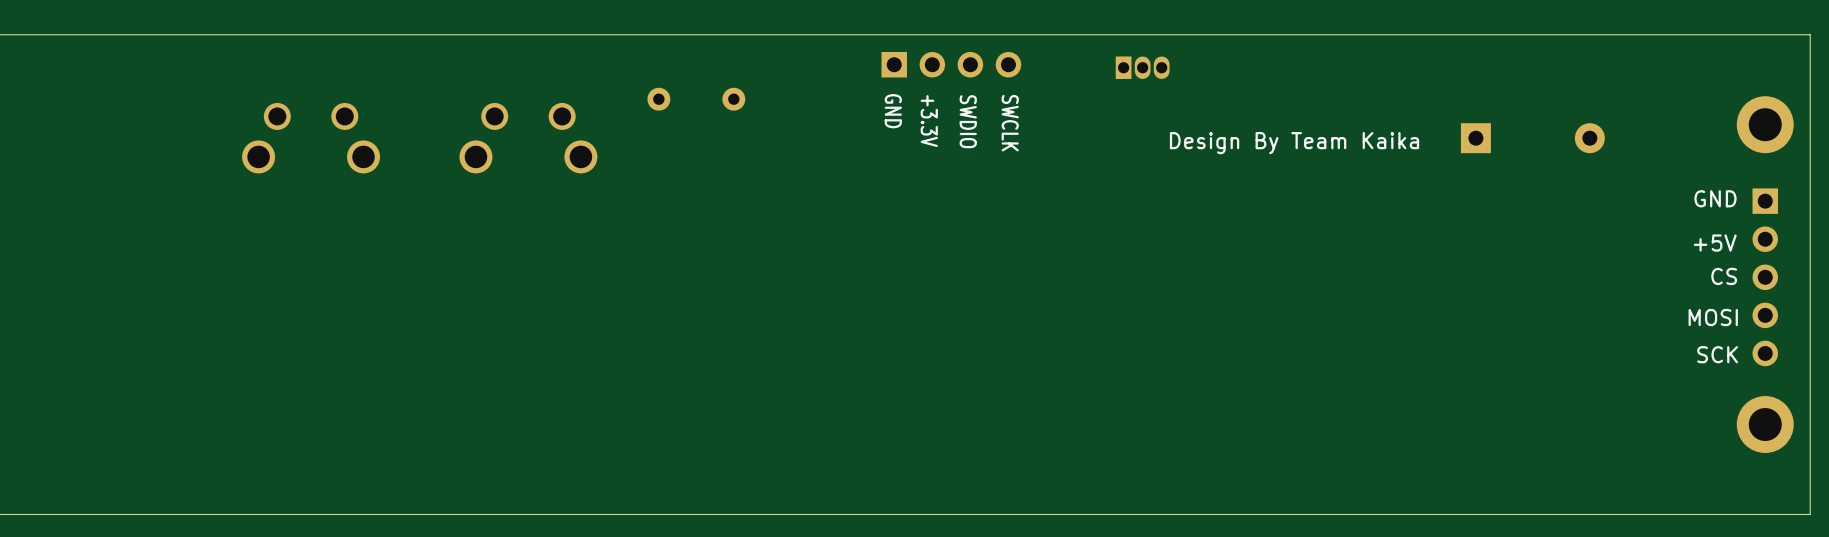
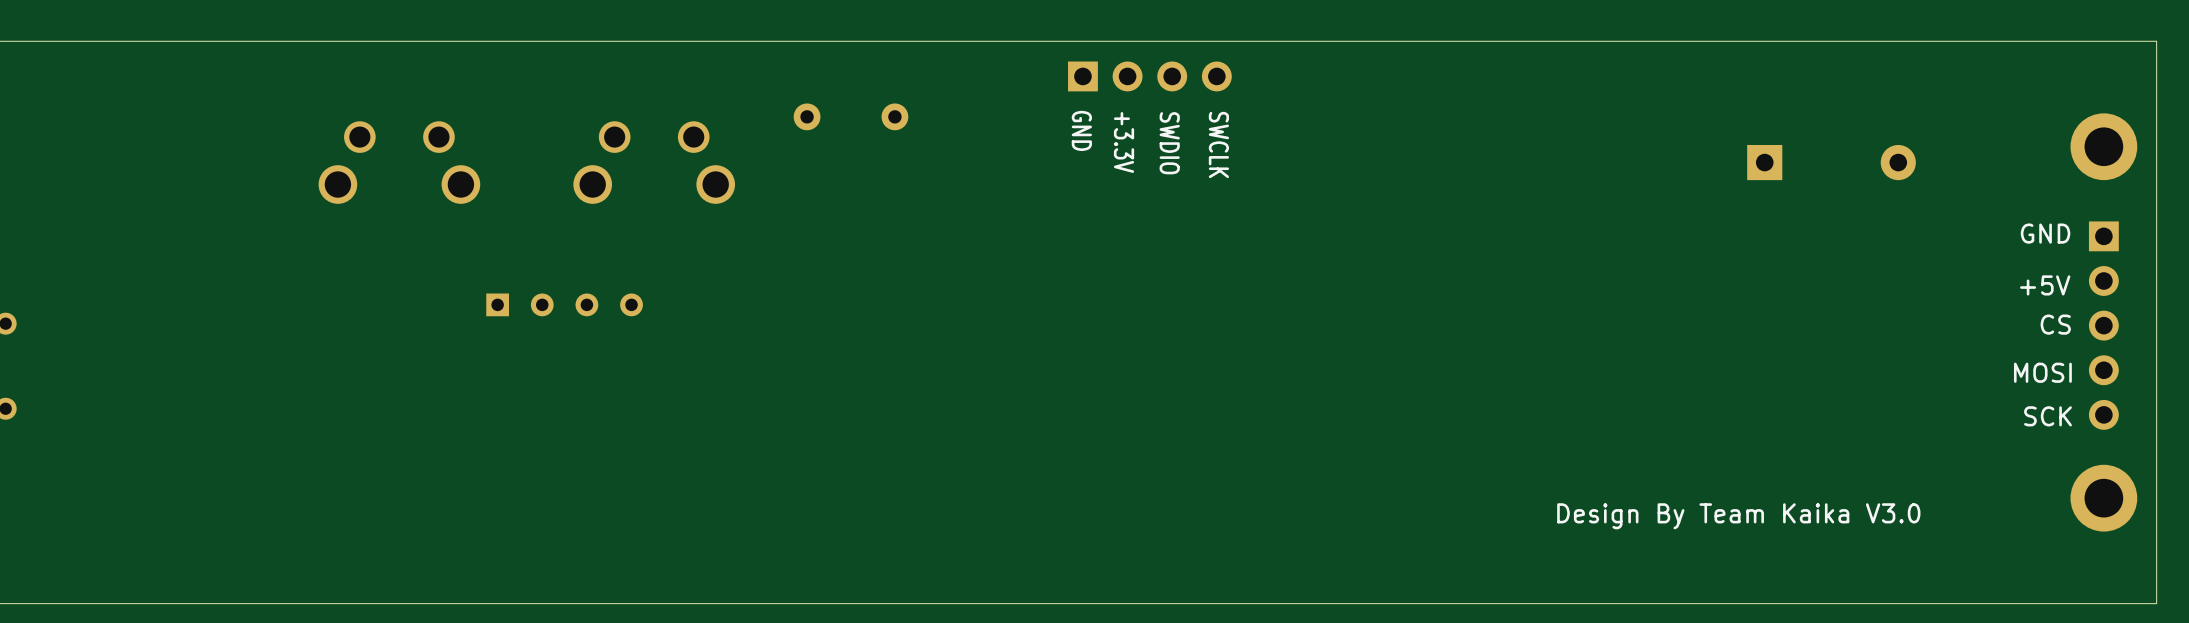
part: (1142, 67) -> none
text: Design By Team Kaika (1294, 143) -> none
part: none -> (564, 304)
text: none -> Design By Team Kaika V3.0 (1738, 516)

